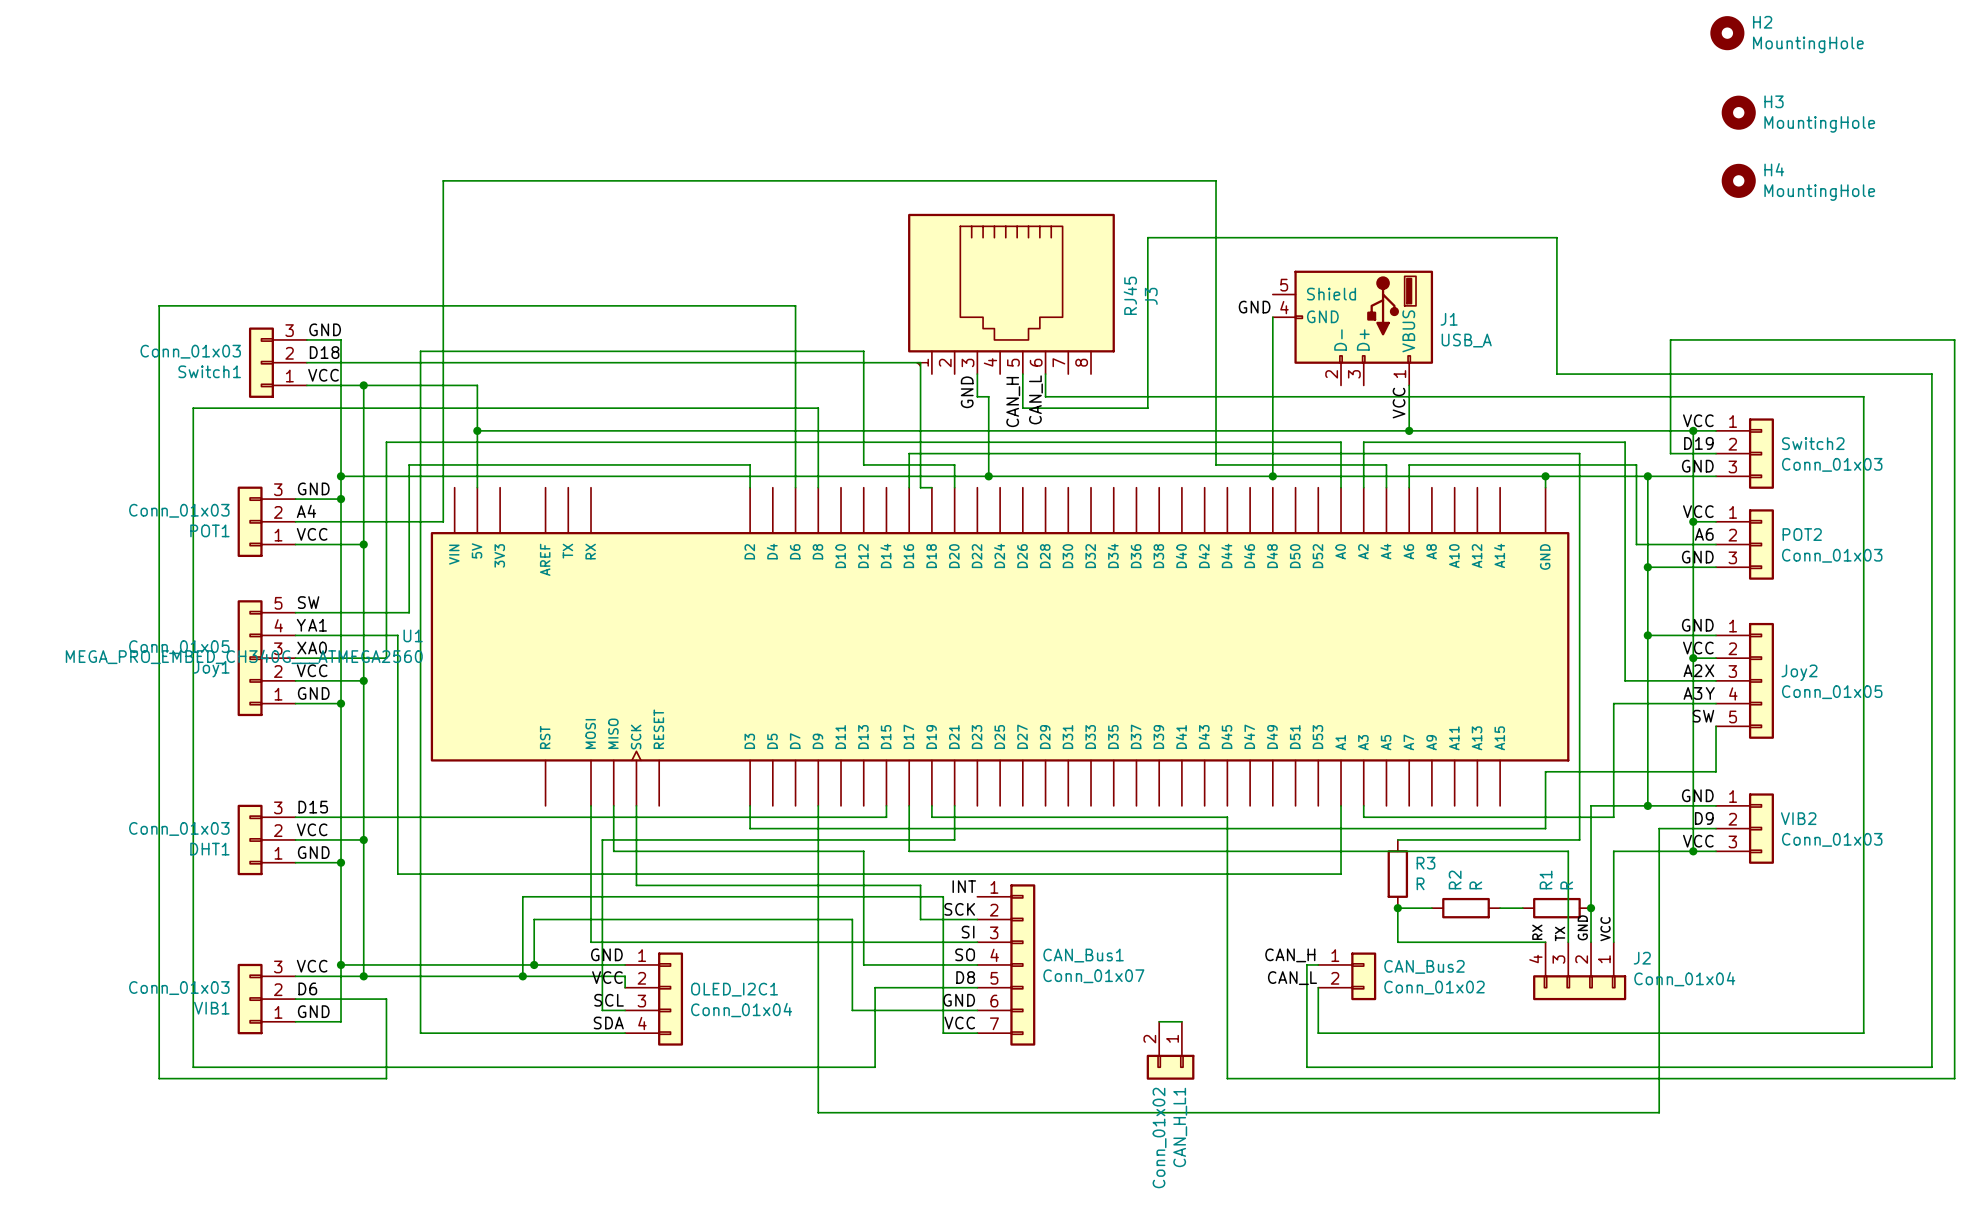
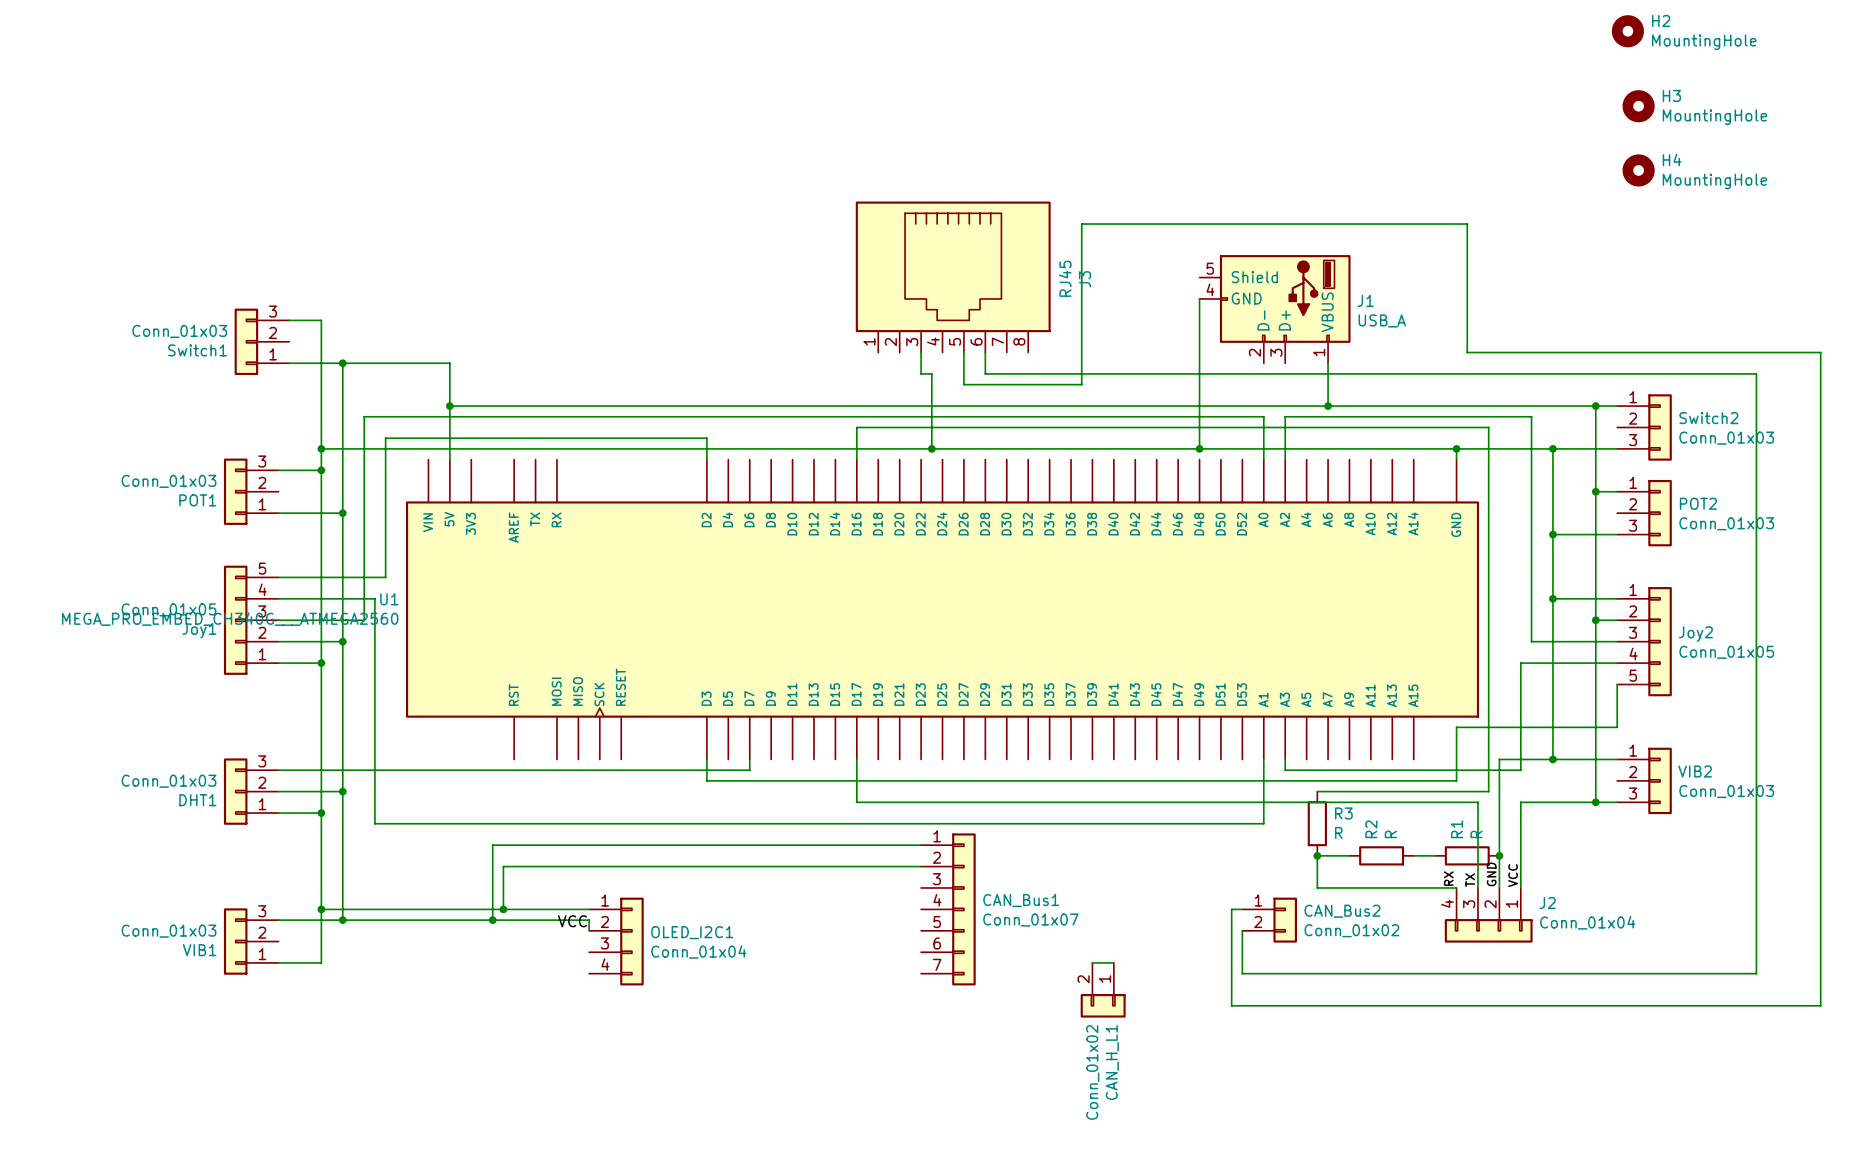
label: GND (1254, 307) -> none
label: GND (325, 329) -> none
label: D18 (324, 352) -> none
wire: (306, 362) (920, 362) (920, 487) (931, 487) -> none
label: VCC (323, 375) -> none
label: GND (967, 392) -> none
label: CAN_L (1035, 399) -> none
label: CAN_H (1013, 402) -> none
label: VCC (1399, 403) -> none
label: VCC (1698, 420) -> none
label: D19 (1698, 443) -> none
wire: (1716, 453) (1670, 453) (1670, 339) (1954, 339) (1954, 1078) (1227, 1078) (1227, 817) (931, 817) (931, 805) -> none
label: GND (1697, 466) -> none
wire: (795, 487) (795, 305) (159, 305) (159, 1078) (386, 1078) (386, 999) (295, 999) -> none
wire: (818, 487) (818, 408) (193, 408) (193, 1067) (875, 1067) (875, 987) (977, 987) -> none
wire: (954, 487) (954, 464) (863, 464) (863, 351) (420, 351) (420, 1033) (625, 1033) -> none
wire: (1386, 487) (1386, 464) (1216, 464) (1216, 180) (443, 180) (443, 521) (295, 521) -> none
wire: (1409, 487) (1409, 464) (1636, 464) (1636, 544) (1716, 544) -> none
label: GND (313, 488) -> none
label: A4 (306, 511) -> none
label: VCC (1698, 511) -> none
label: VCC (312, 534) -> none
label: A6 (1704, 534) -> none
label: GND (1697, 557) -> none
label: SW (308, 602) -> none
label: Y (301, 625) -> none
label: A1 (317, 625) -> none
label: GND (1697, 625) -> none
label: X (301, 648) -> none
label: A0 (317, 648) -> none
label: VCC (1698, 648) -> none
label: VCC (312, 670) -> none
label: A2 (1692, 670) -> none
label: X (1709, 670) -> none
label: GND (313, 693) -> none
label: A3 (1692, 693) -> none
label: Y (1710, 693) -> none
label: SW (1703, 716) -> none
label: GND (1697, 795) -> none
wire: (591, 805) (591, 942) (977, 942) -> none
wire: (613, 805) (613, 851) (863, 851) (863, 964) (977, 964) -> none
wire: (636, 805) (636, 885) (920, 885) (920, 919) -> none
wire: (818, 805) (818, 1112) (1659, 1112) (1659, 828) (1716, 828) -> none
wire: (886, 805) (886, 817) (795, 817) -> (749, 759) (749, 770)
wire: (954, 805) (954, 839) (602, 839) (602, 1010) (625, 1010) -> none
label: D15 (313, 807) -> none
label: D9 (1704, 818) -> none
label: VCC (312, 829) -> none
label: VCC (1698, 841) -> none
label: GND (313, 852) -> none
label: INT (964, 886) -> none
wire: (943, 896) (943, 1033) (977, 1033) -> (888, 845) (921, 845)
label: SCK (959, 909) -> none
wire: (852, 919) (852, 1010) (977, 1010) -> (803, 866) (867, 866)
label: SI (968, 932) -> none
label: GND (606, 954) -> none
label: SO (965, 954) -> none
label: CAN_H (1290, 955) -> none
label: VCC (312, 966) -> none
label: D8 (965, 977) -> none
label: CAN_L (1292, 978) -> none
label: D6 (307, 988) -> none
label: SCL (609, 1000) -> none
label: GND (959, 1000) -> none
label: GND (313, 1011) -> none
label: SDA (608, 1023) -> none
label: VCC (959, 1023) -> none

